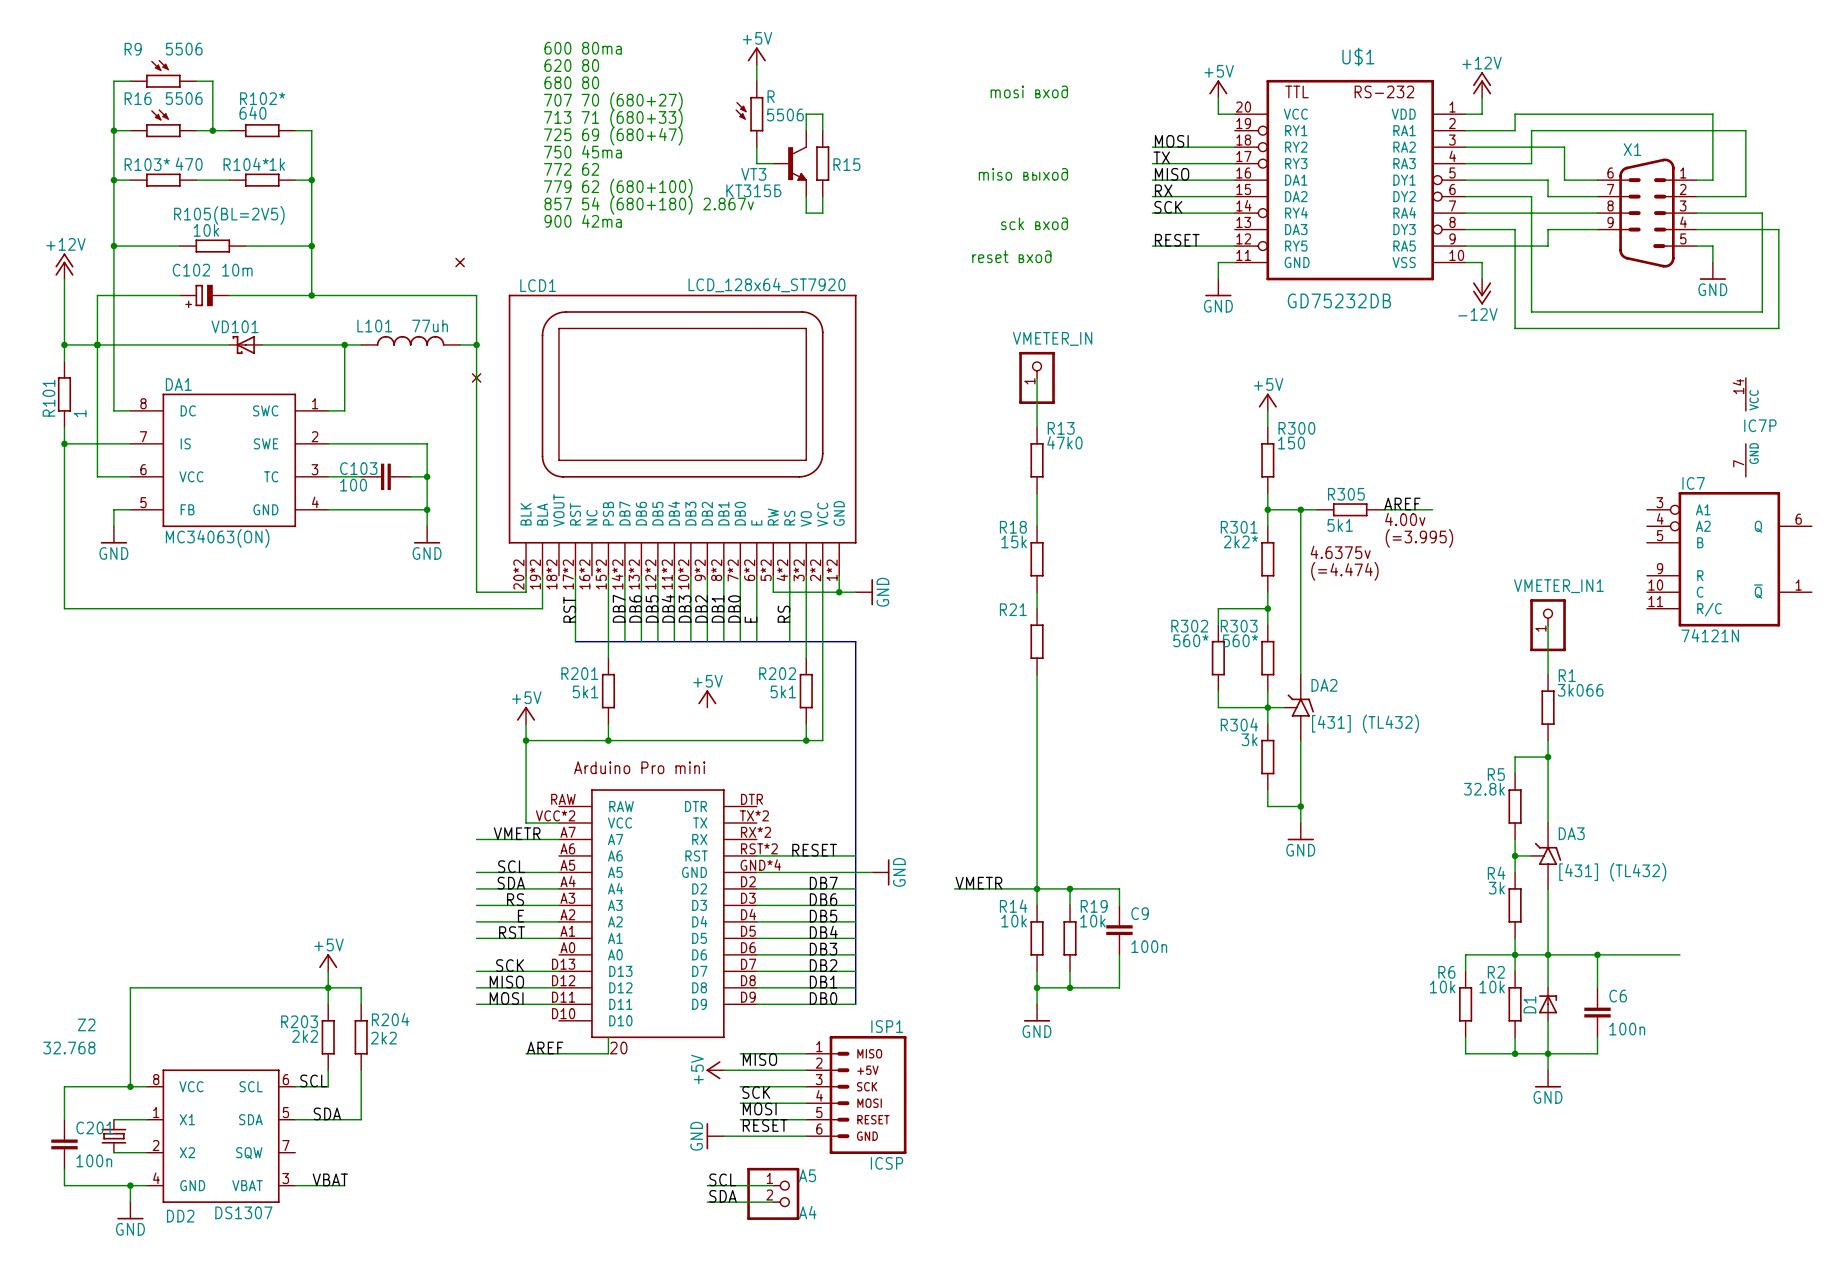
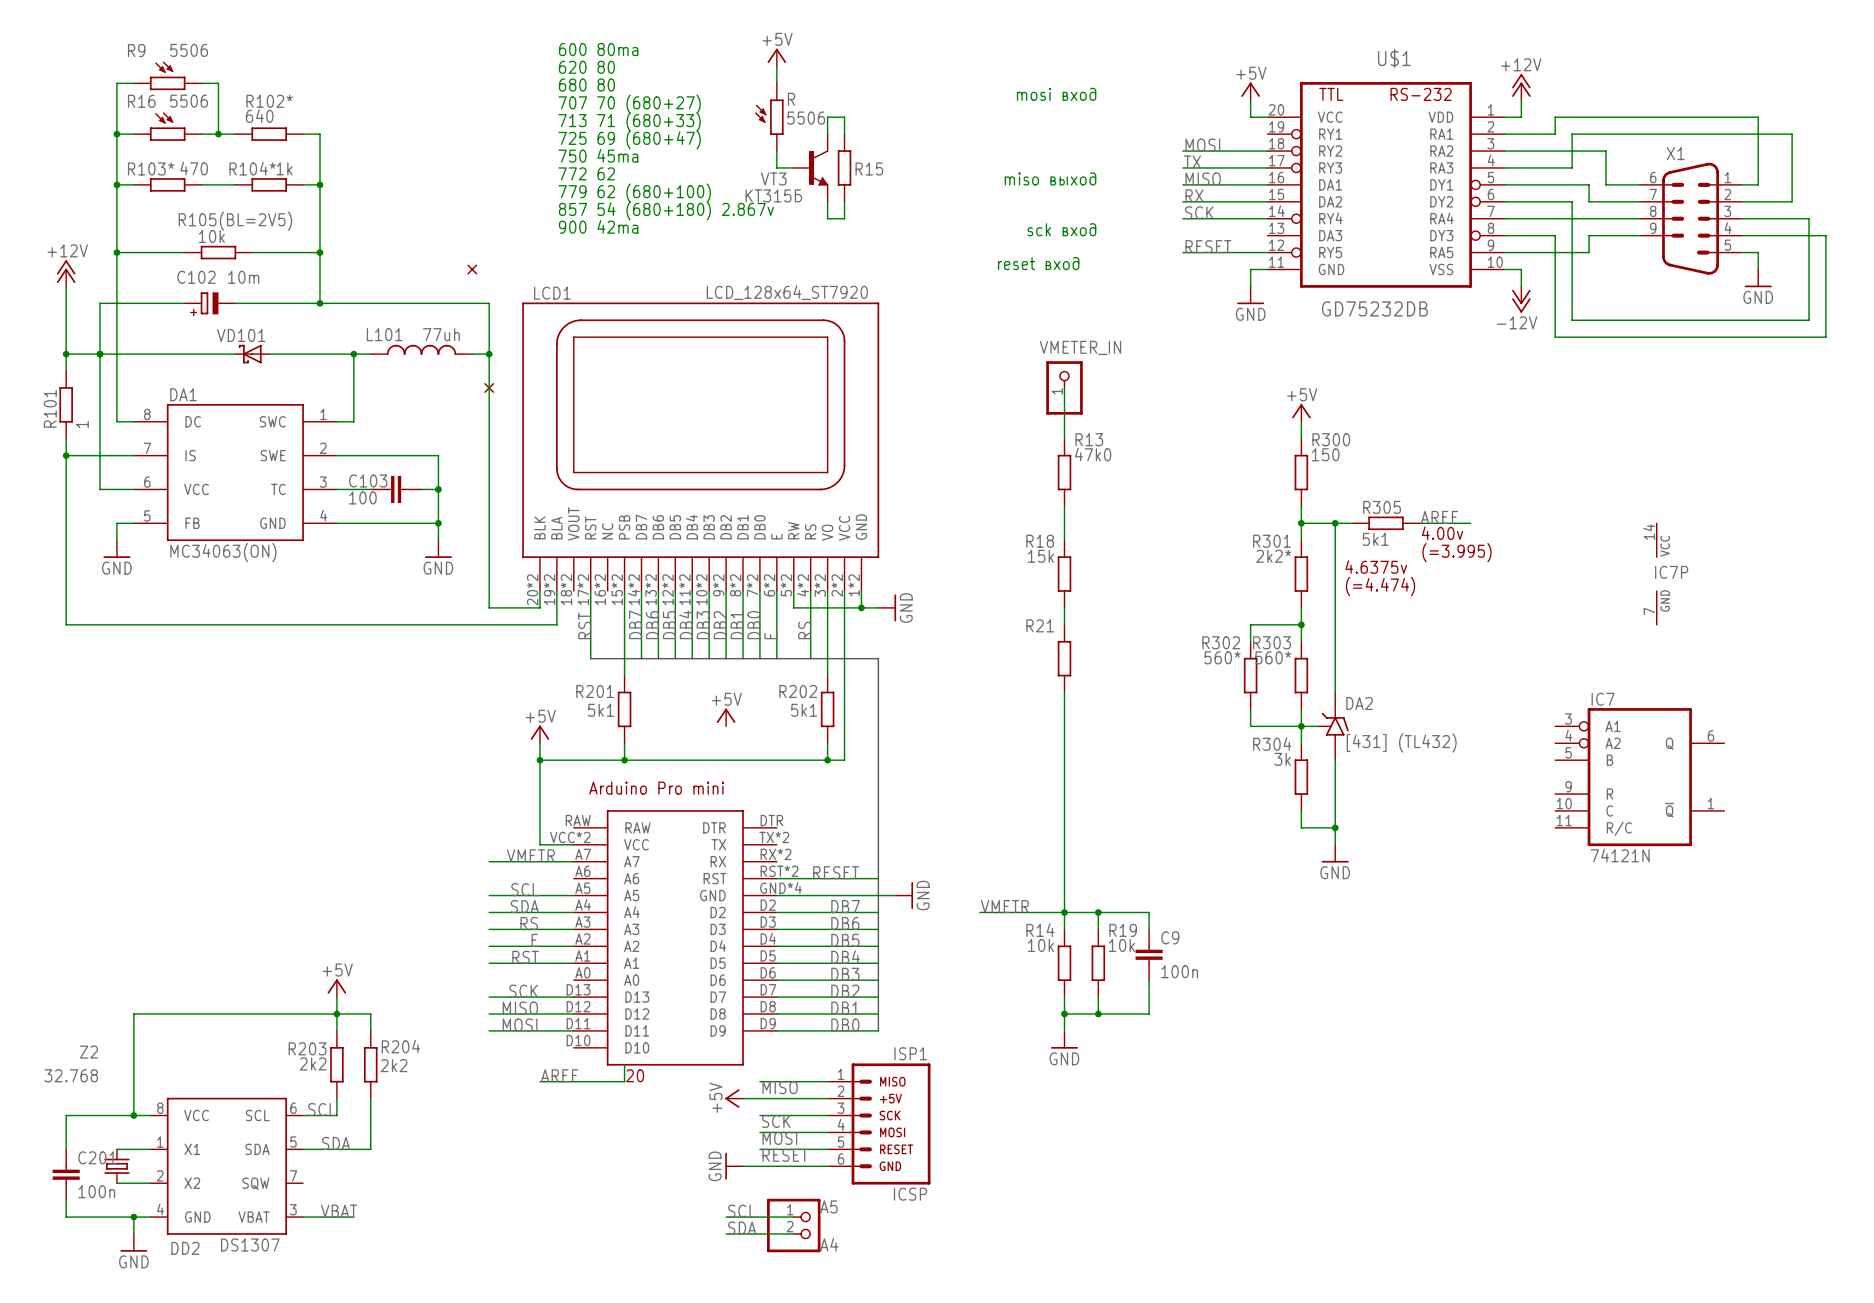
IC7P position: (1745, 427) -> (1656, 574)
IC7 position: (1729, 559) -> (1639, 777)
wire: (1548, 625) (1548, 674) -> none
VMETER_IN1: (1548, 625) -> none
R1: 3k066 (1548, 707) -> none
wire: (1548, 757) (1515, 757) (1515, 773) -> none
junction: (1548, 757) -> none
R5: 32.8k (1515, 806) -> none
wire: (1515, 839) (1515, 872) -> none
wire: (1515, 855) (1531, 855) -> none
junction: (1515, 855) -> none
DA3: [431] (TL432) (1546, 855) -> none
wire: (1548, 888) (1548, 987) -> none
R4: 3k (1515, 905) -> none
wire: (1515, 938) (1515, 971) -> none
junction: (1515, 954) -> none
junction: (1548, 954) -> none
wire: (1597, 954) (1597, 987) -> none
junction: (1597, 954) -> none
wire: (1679, 954) (1465, 954) (1465, 971) -> none
R6: 10k (1465, 1004) -> none
R2: 10k (1515, 1004) -> none
D1: (1548, 1004) -> none
C6: 100n (1597, 1012) -> none
wire: (1548, 1020) (1548, 1070) -> none
wire: (1465, 1037) (1465, 1053) (1597, 1053) (1597, 1037) -> none
wire: (1515, 1037) (1515, 1053) -> none
junction: (1515, 1053) -> none
junction: (1548, 1053) -> none
power symbol: GND (1548, 1078) -> none

